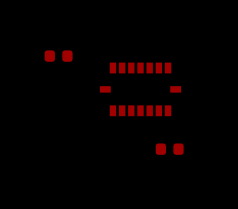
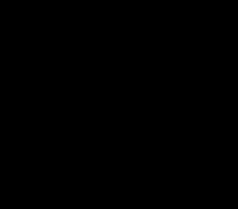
part: (58, 56) -> none
part: (140, 89) -> none
part: (169, 149) -> none

